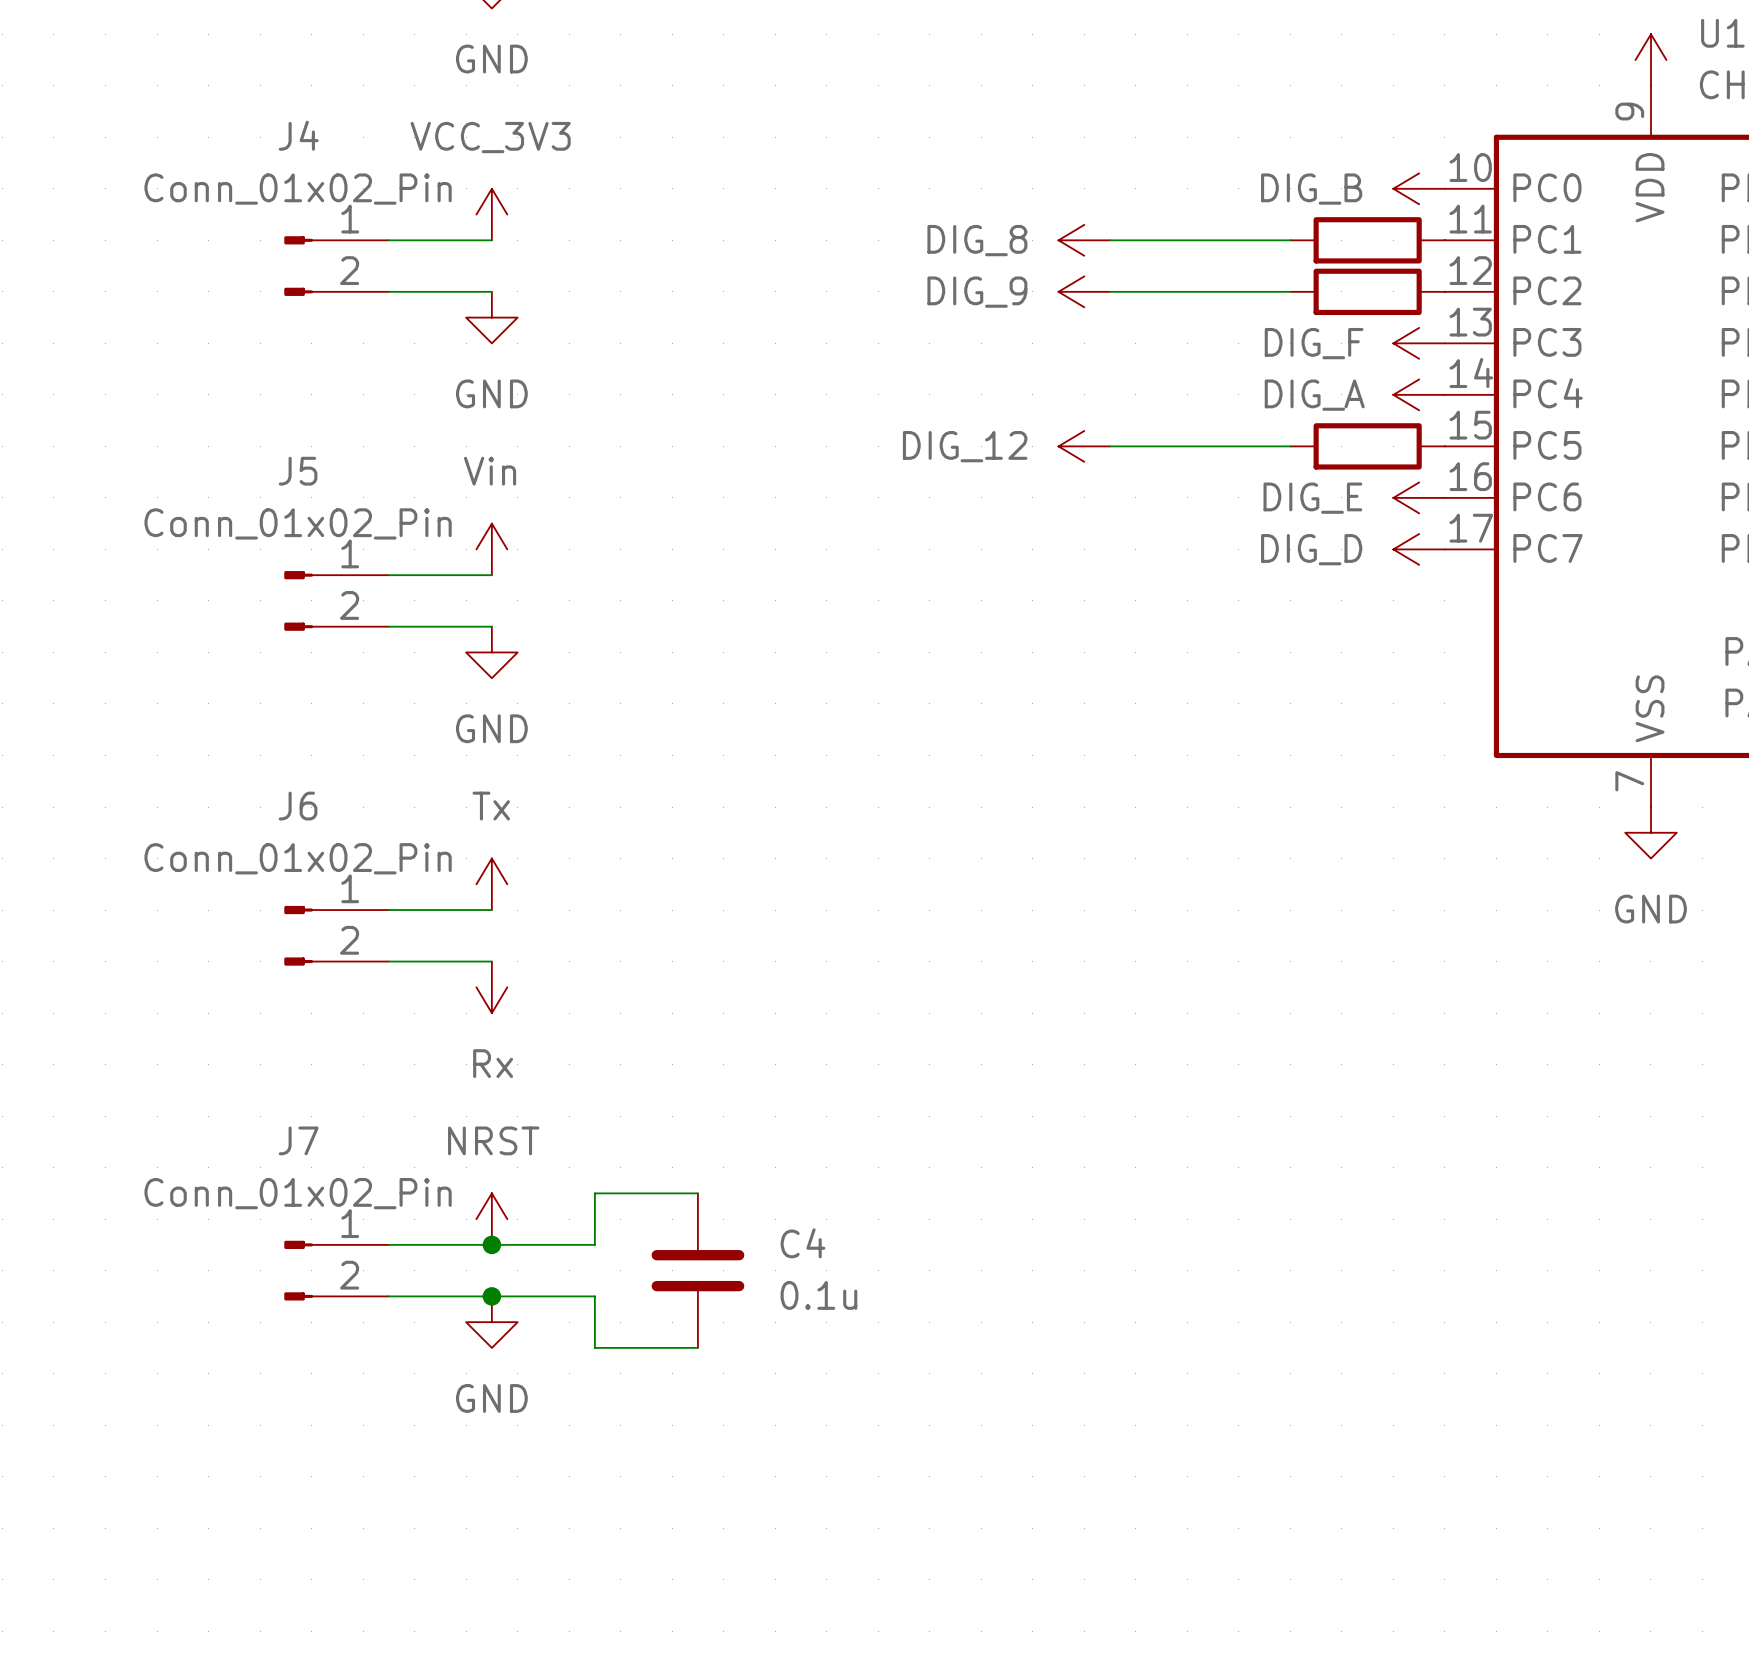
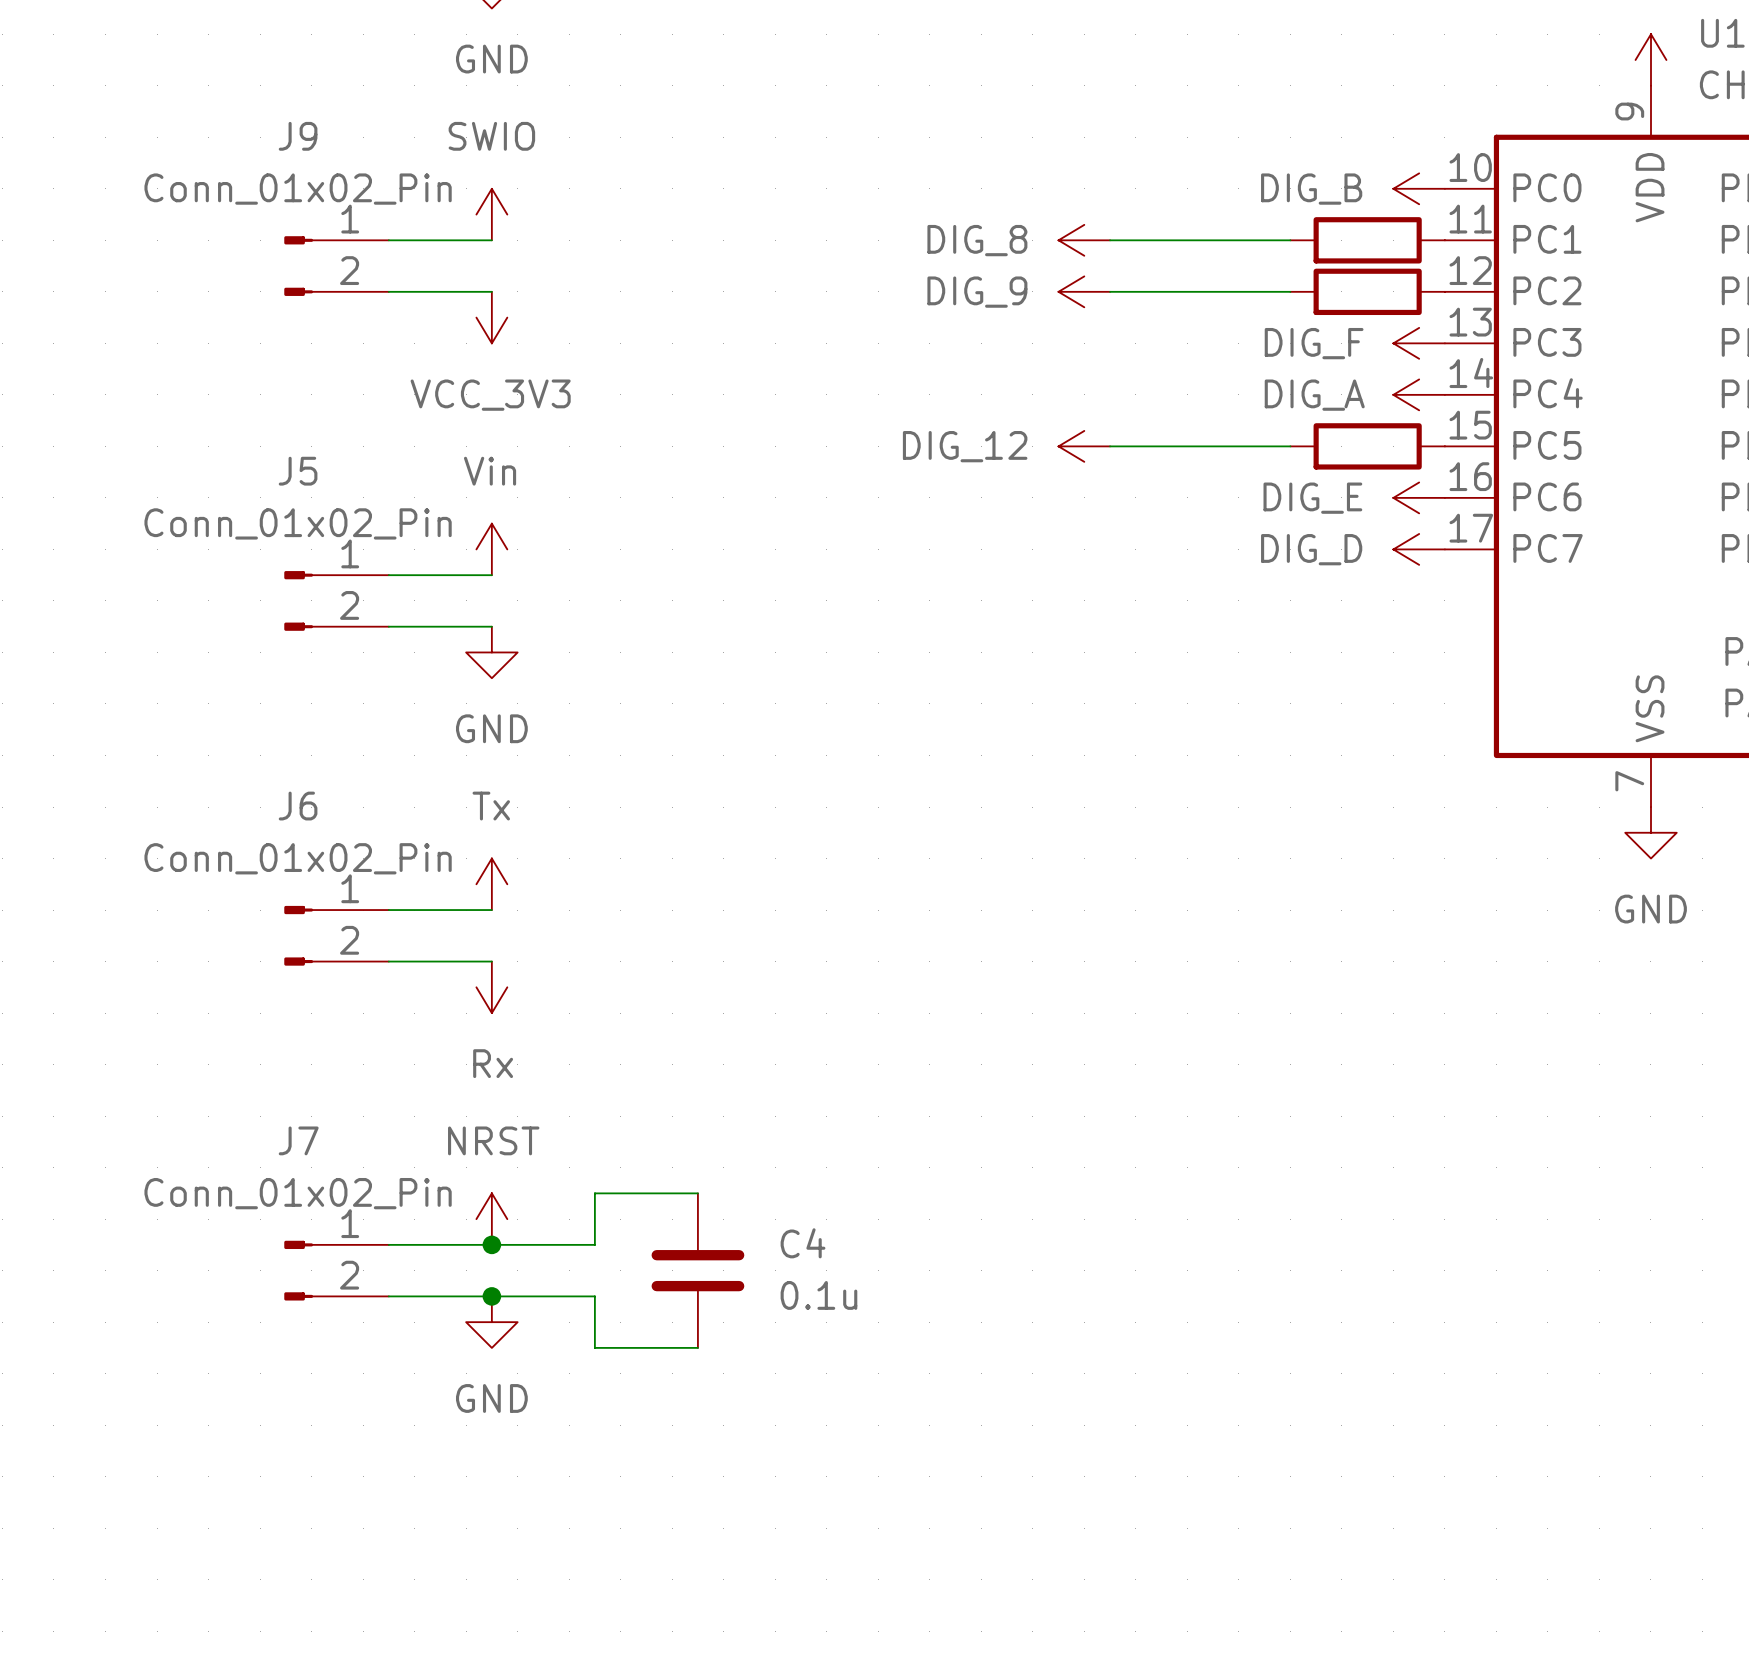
J4 name: J4 (298, 135) -> J9 (298, 136)
power symbol: VCC_3V3 (491, 214) -> SWIO (491, 214)
power symbol: GND (491, 317) -> VCC_3V3 (491, 317)

